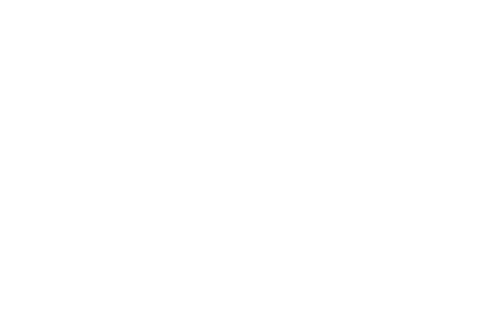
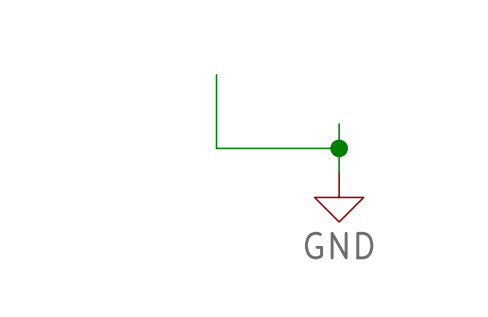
wire: none -> (216, 74) (216, 148) (339, 148)
wire: none -> (339, 123) (339, 172)
junction: none -> (339, 148)
power symbol: none -> GND (339, 197)

